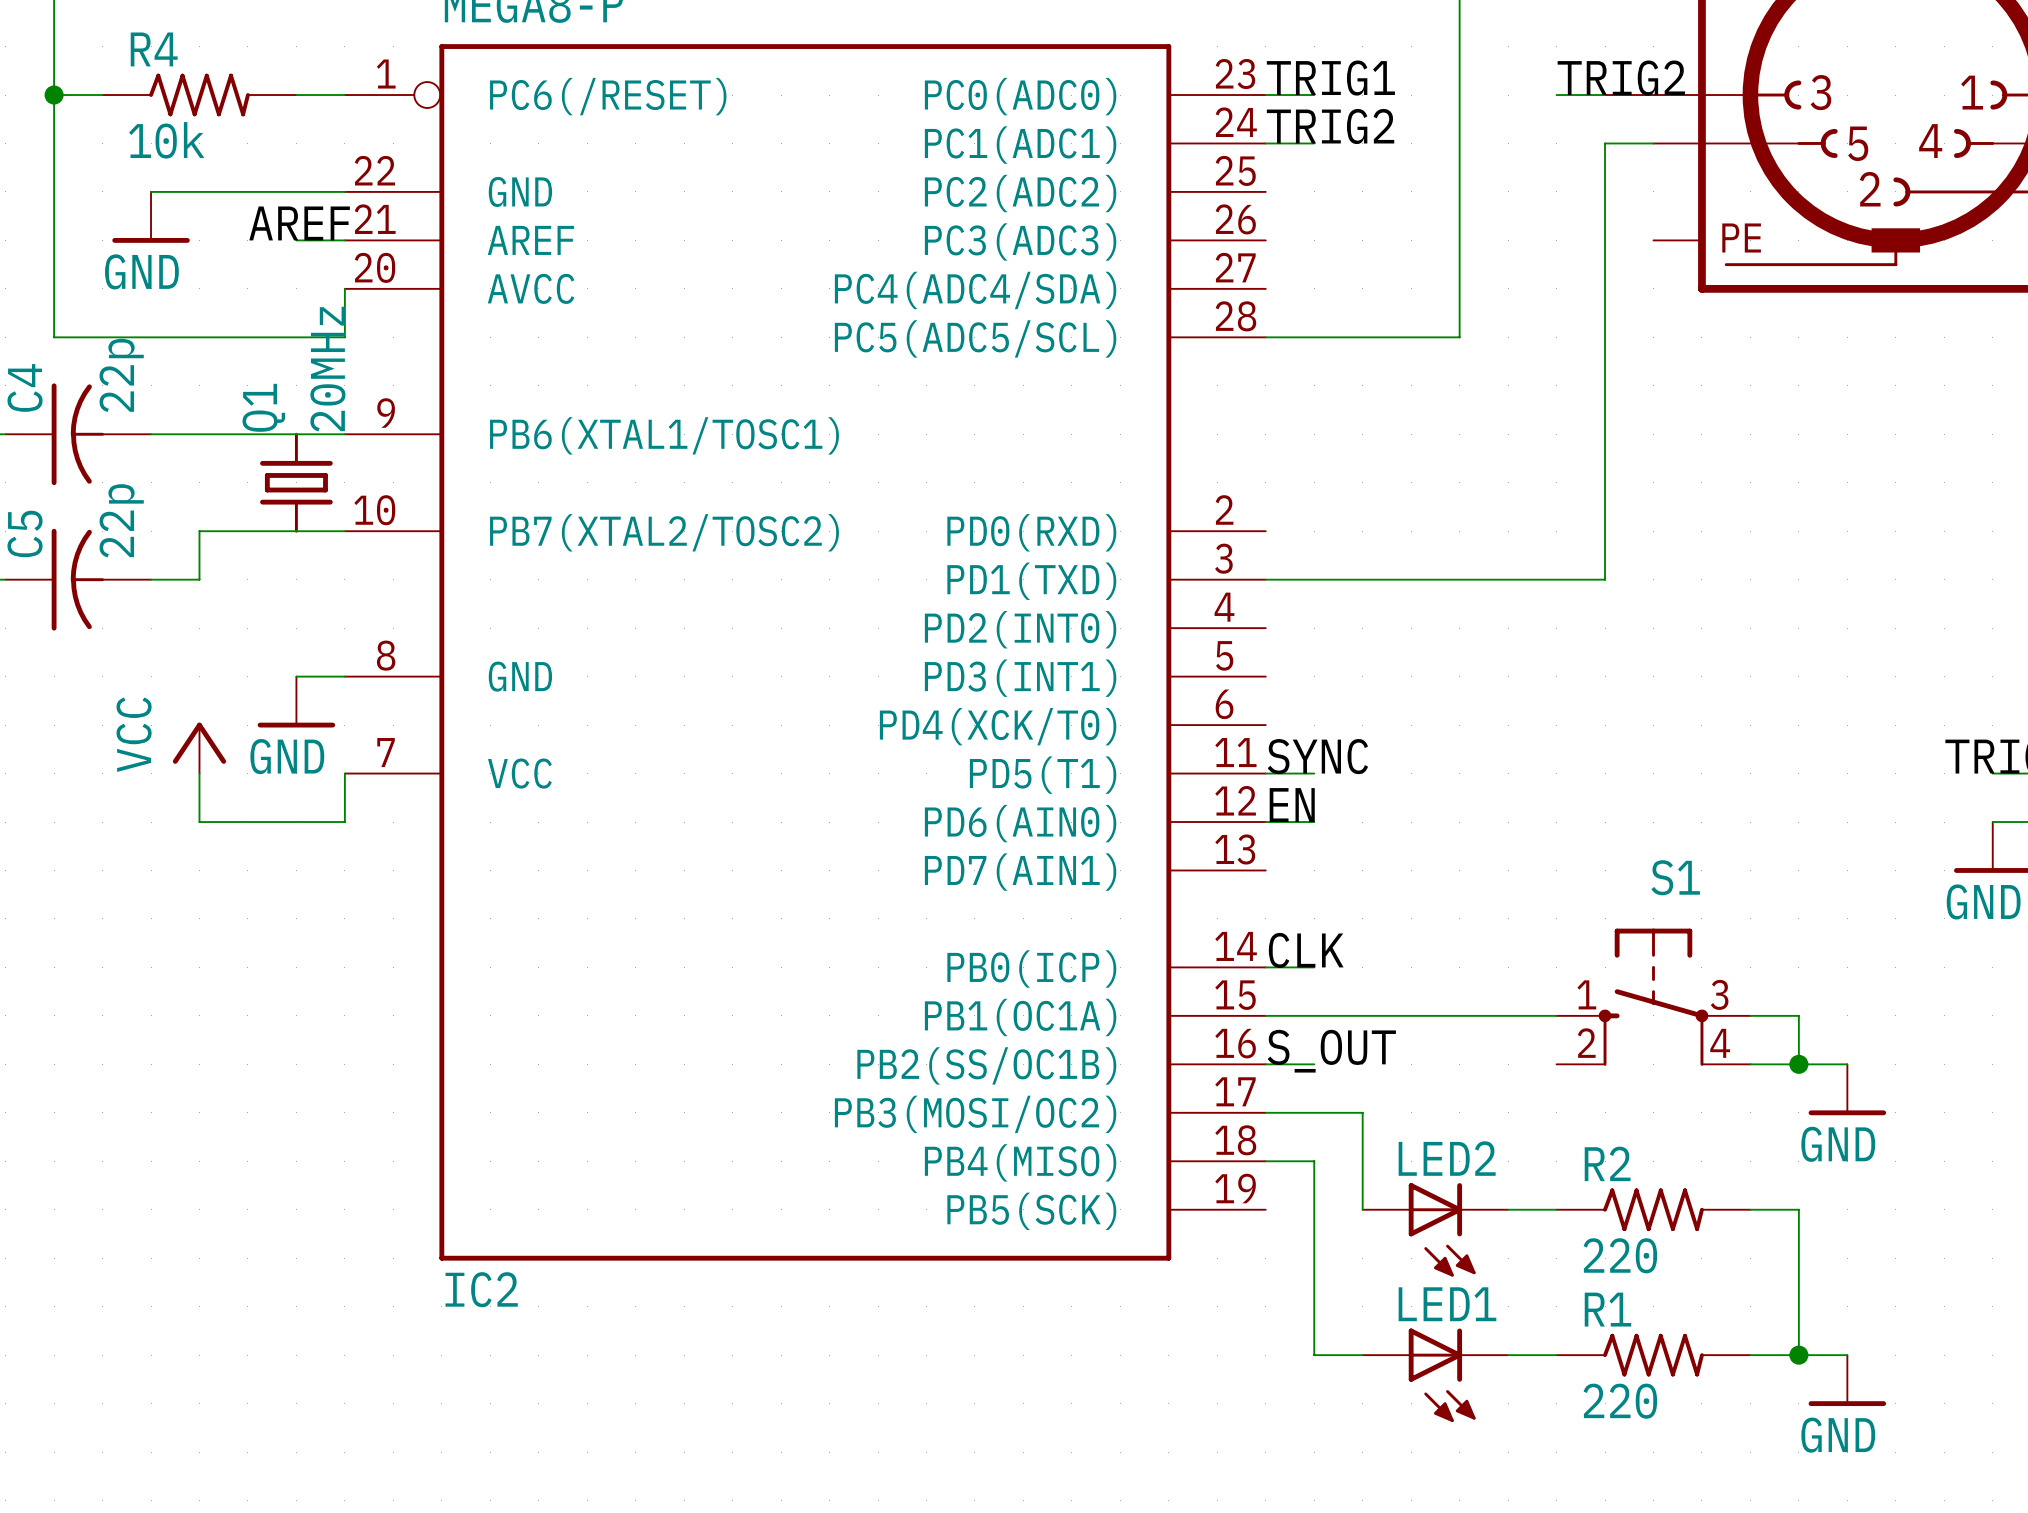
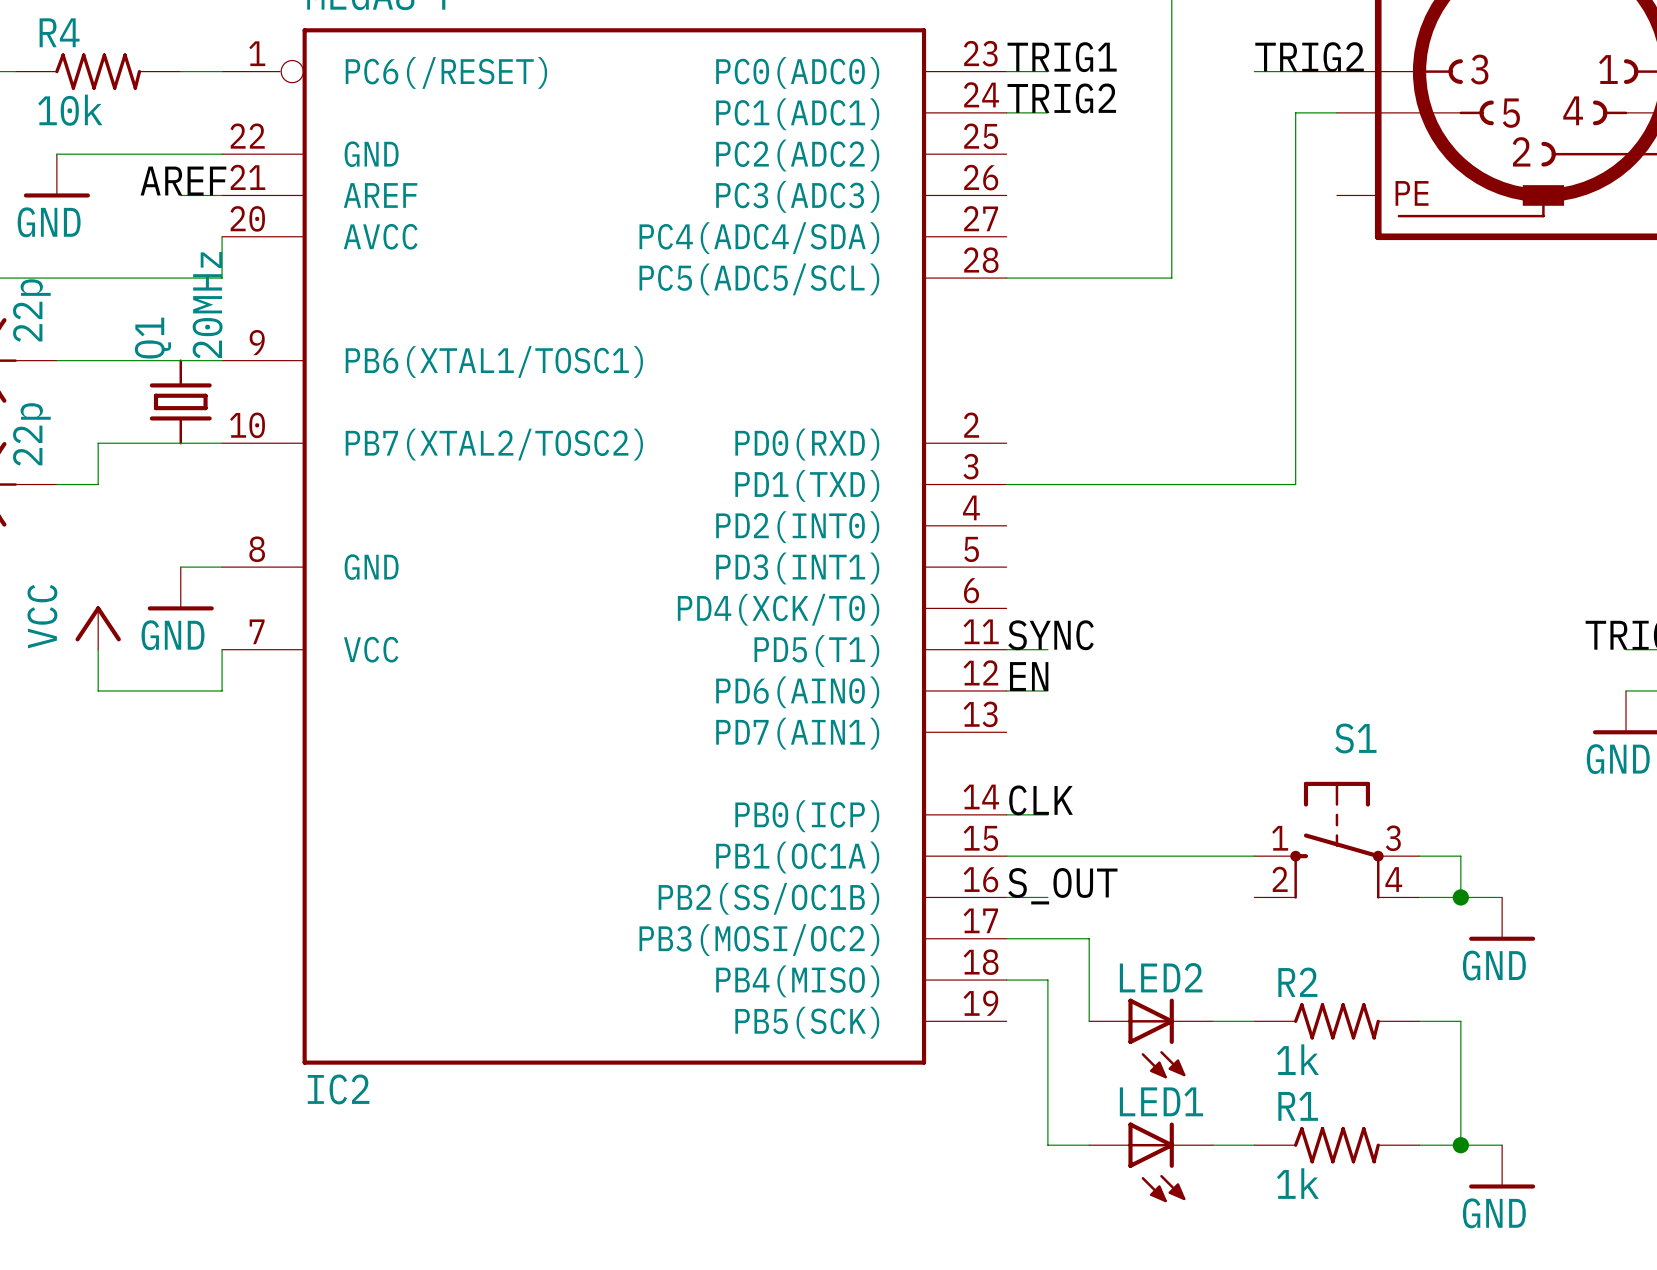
R2 value: 220 (1620, 1255) -> 1k (1297, 1059)
R1 value: 220 (1620, 1401) -> 1k (1297, 1183)

